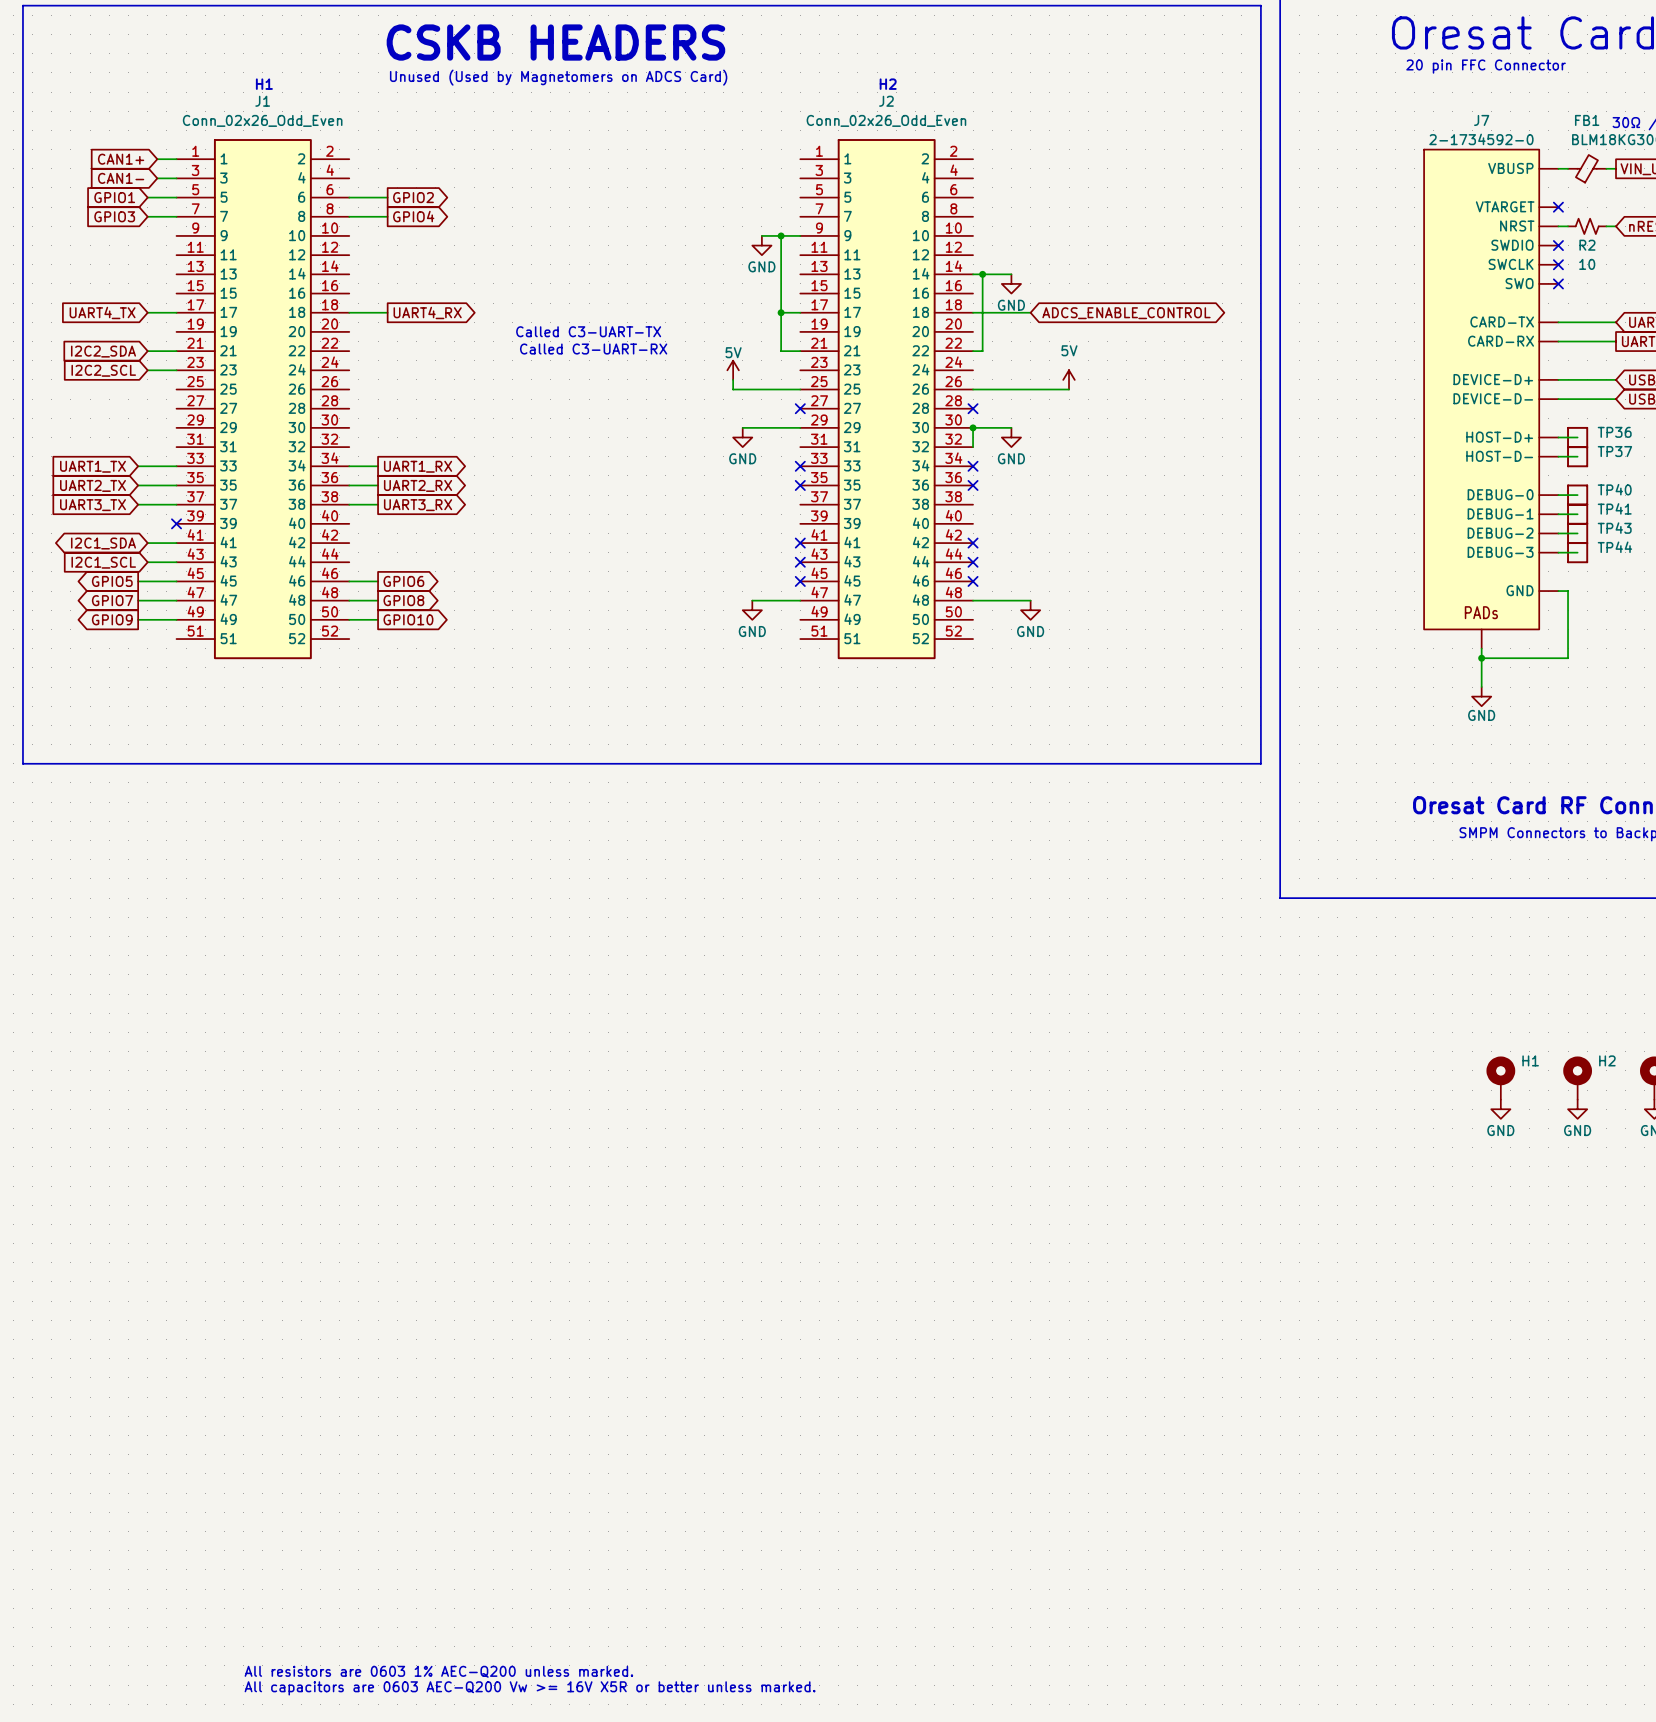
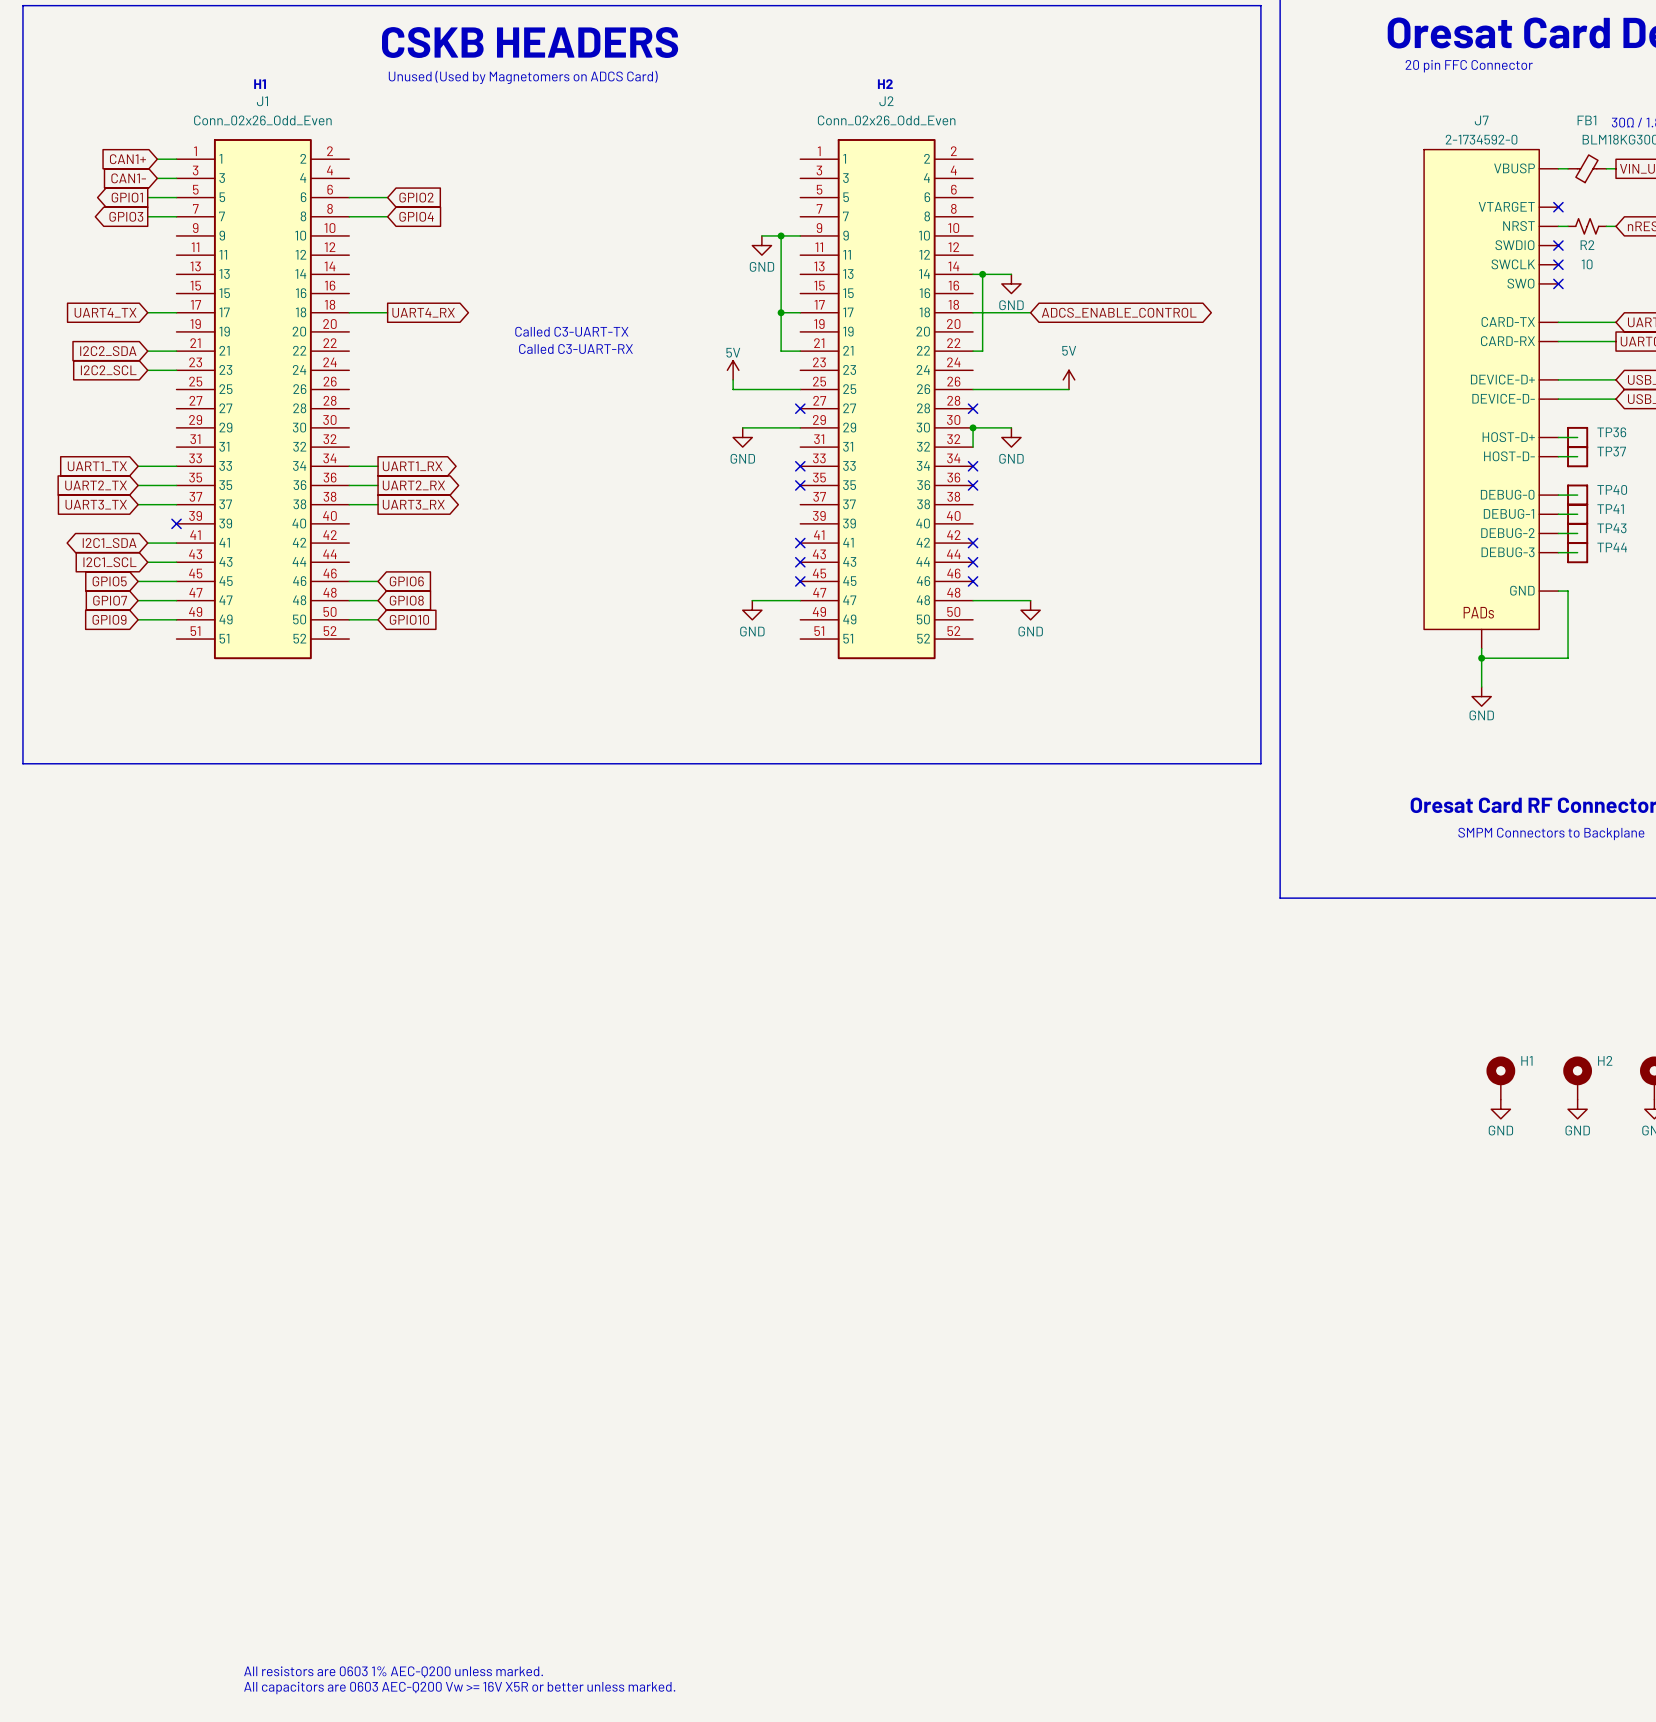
global label shape: input (114, 197) -> output (127, 197)
global label shape: output (413, 197) -> input (416, 197)
global label shape: input (114, 216) -> output (126, 216)
global label shape: output (413, 216) -> input (416, 216)
global label shape: output (112, 581) -> input (109, 581)
global label shape: output (403, 581) -> input (406, 581)
global label shape: output (112, 600) -> input (110, 600)
global label shape: output (403, 600) -> input (406, 600)
global label shape: output (112, 619) -> input (109, 619)
global label shape: output (408, 619) -> input (409, 619)

